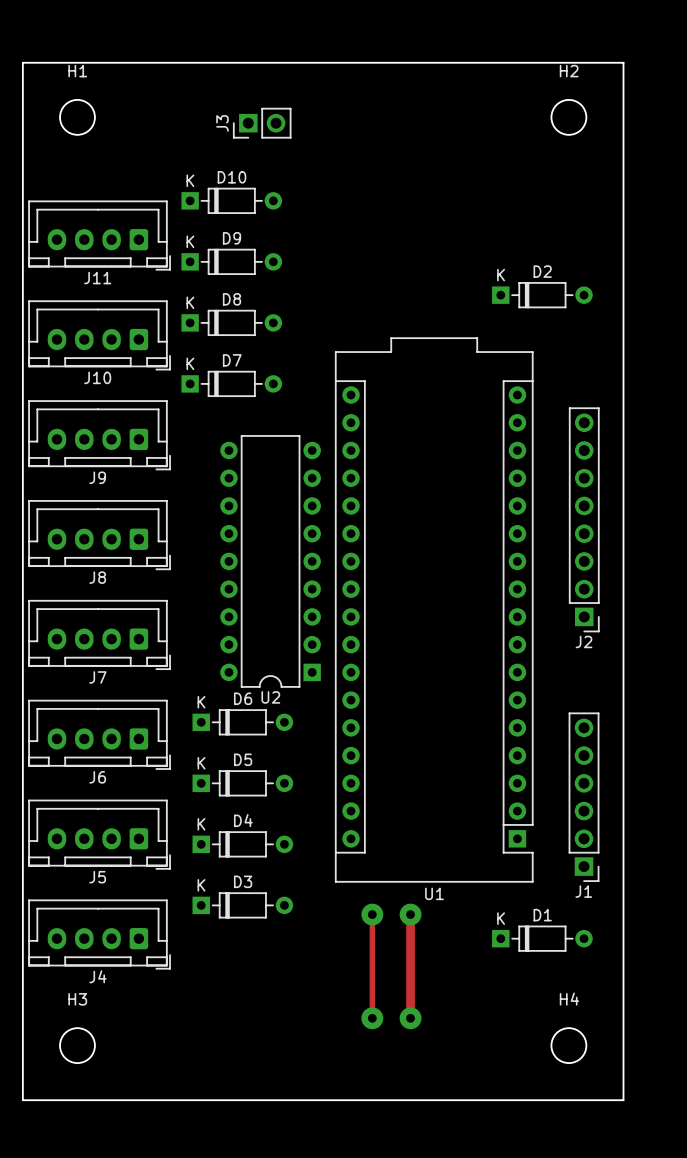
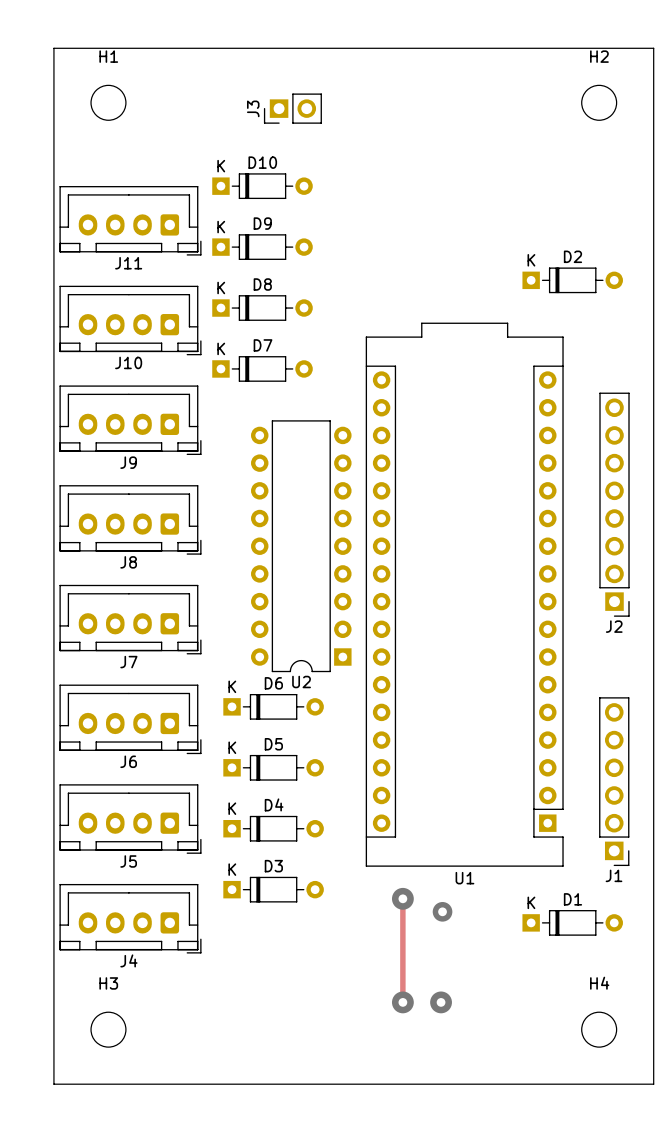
track: (410, 914) (410, 1018) -> none
via: (410, 914) -> none
via: none -> (442, 911)

